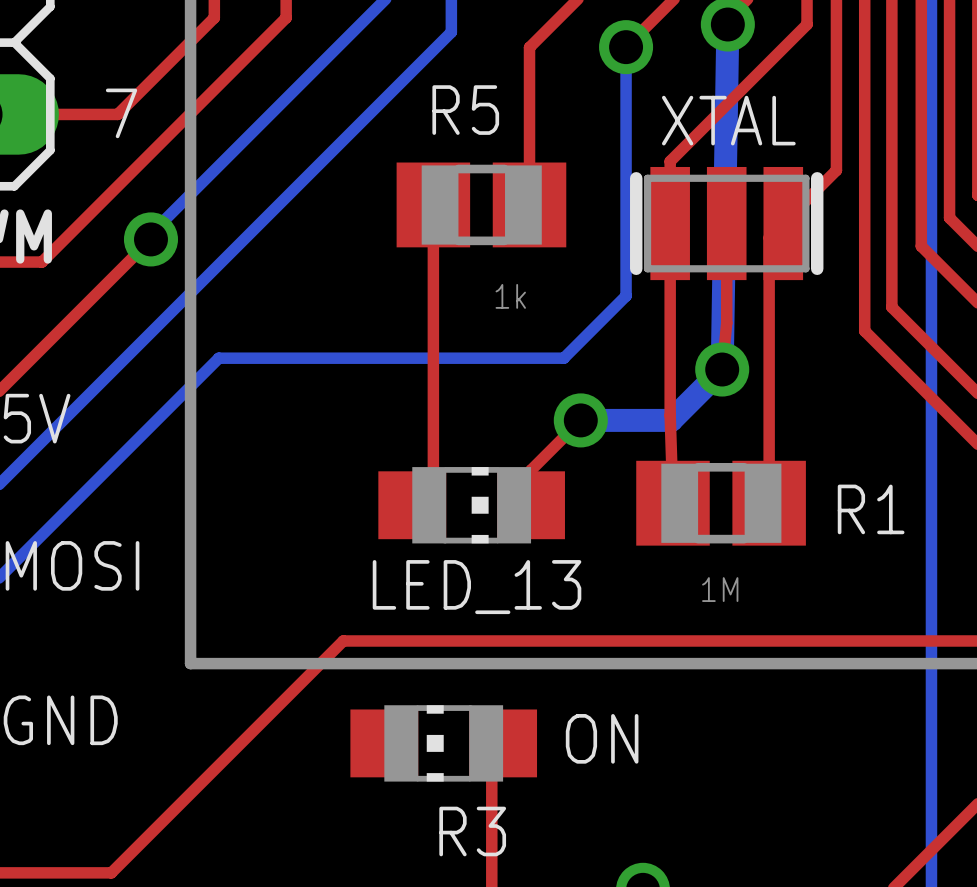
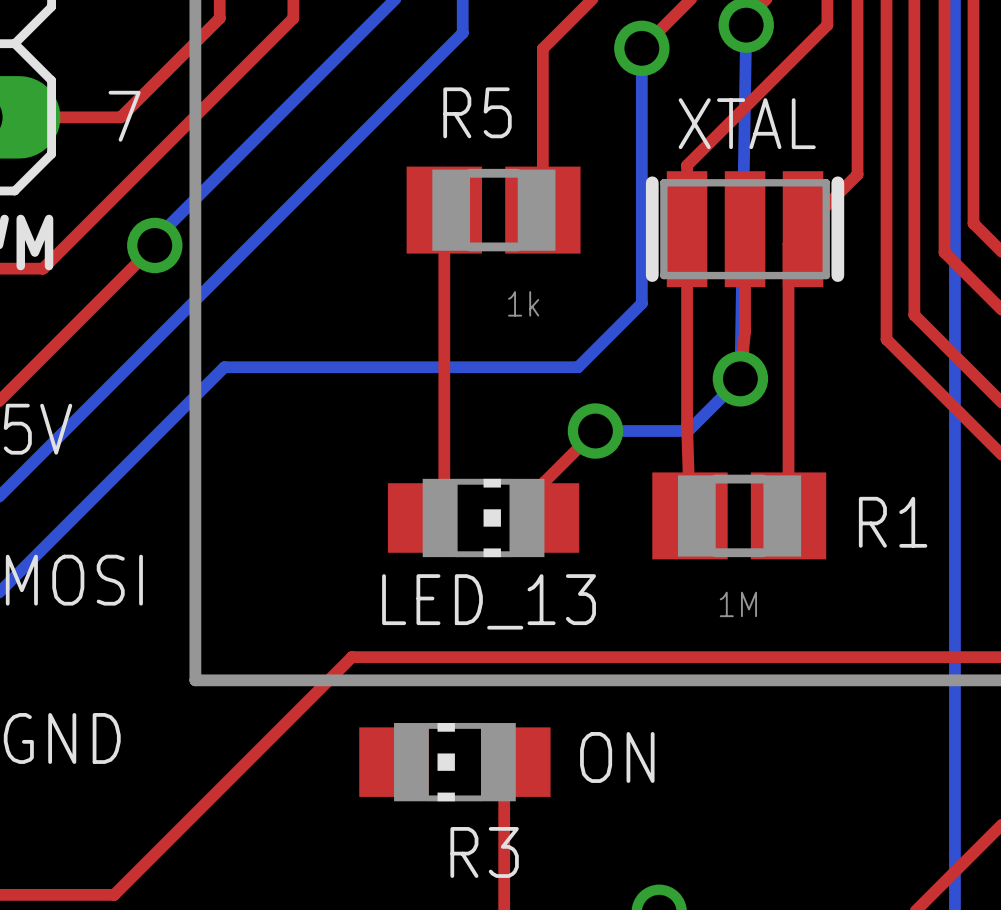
bottom track width: thick (727, 24) (722, 369) (671, 420) (580, 420) -> thin (746, 25) (740, 378) (688, 431) (595, 431)

